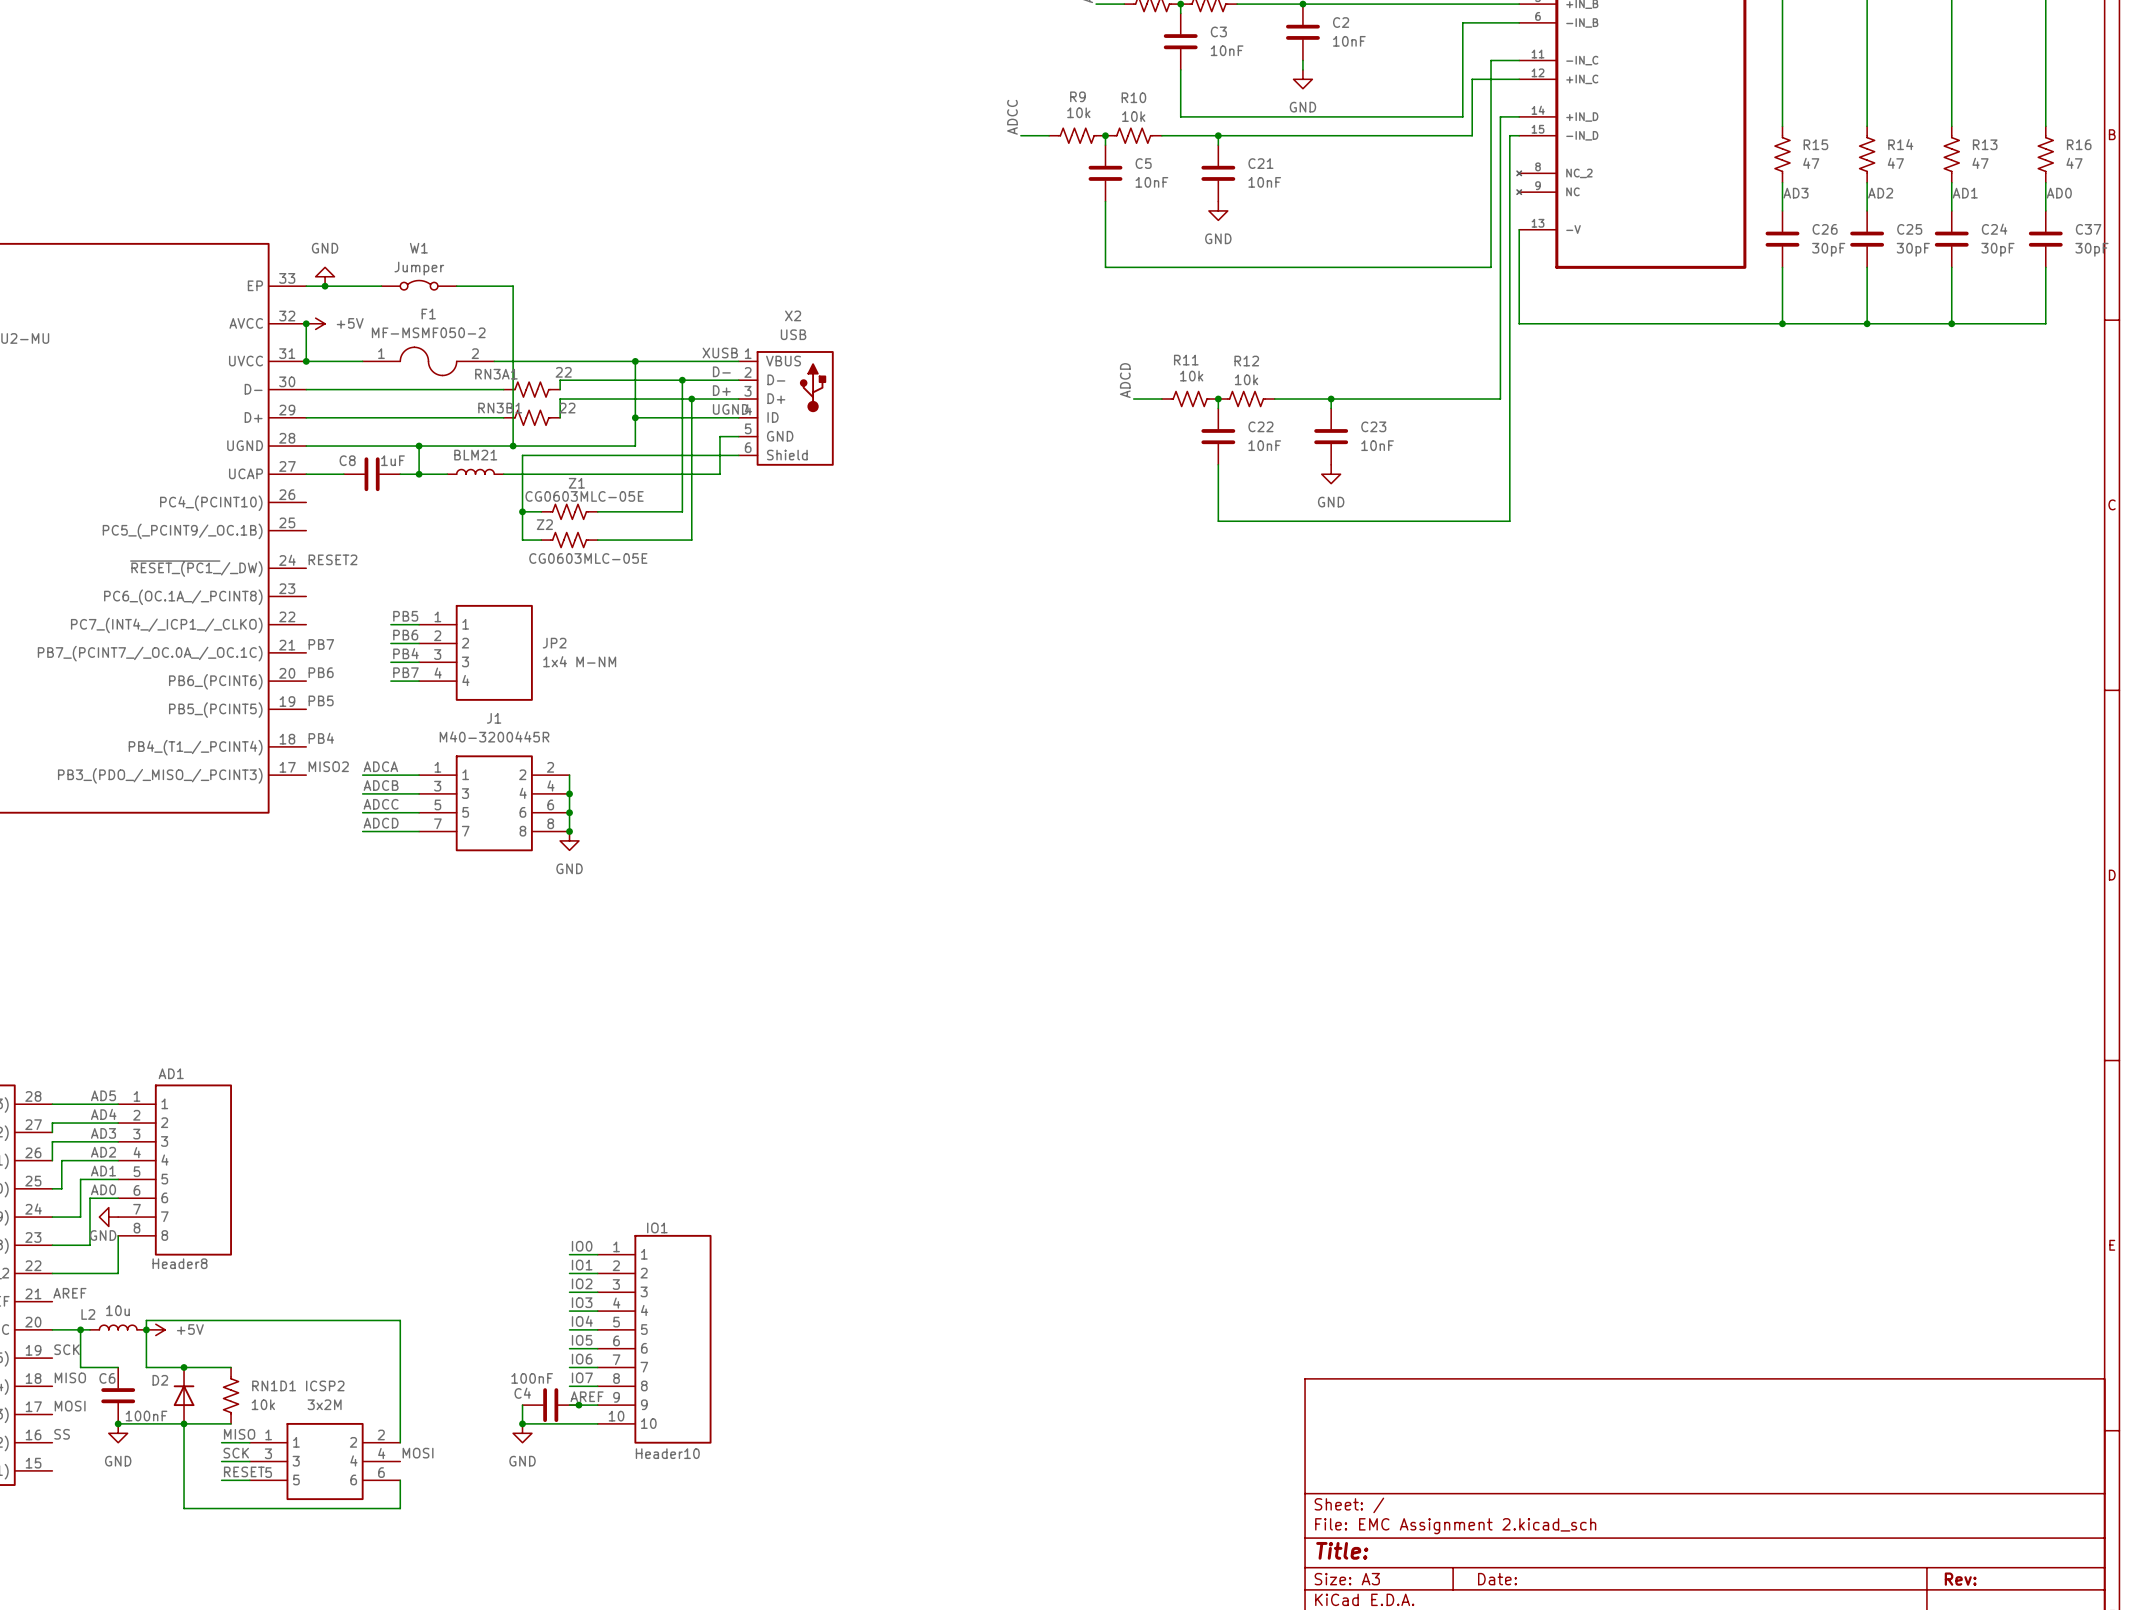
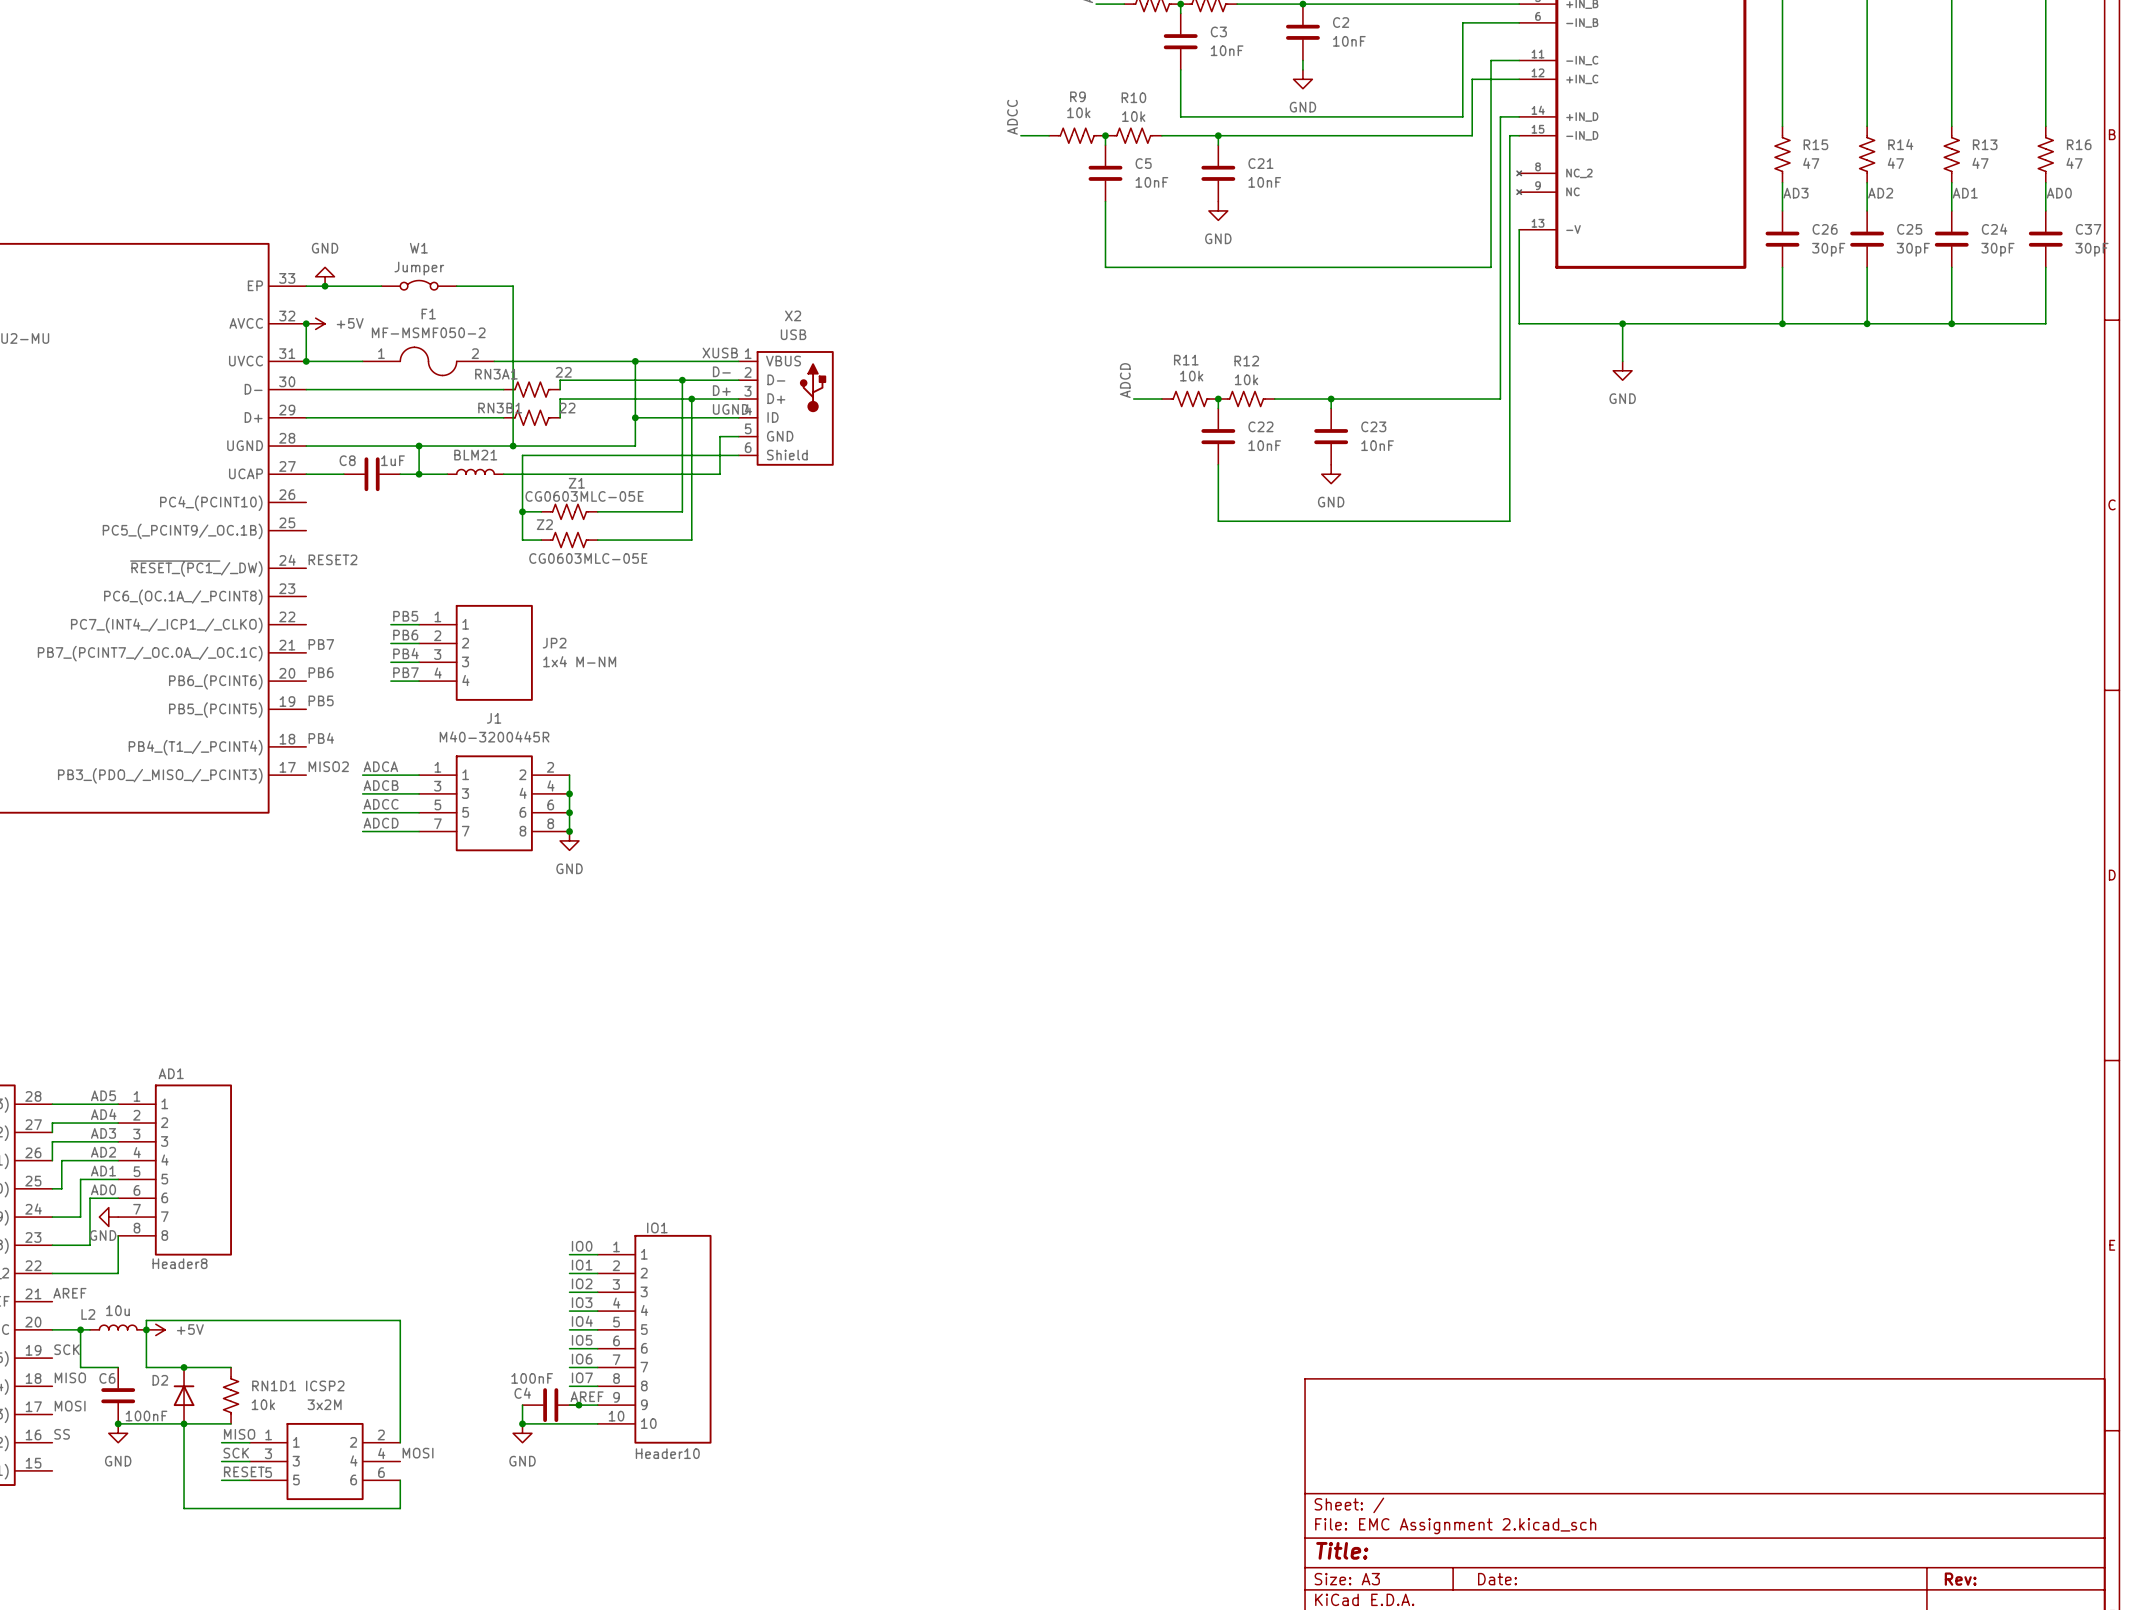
wire: none -> (1622, 323) (1622, 361)
junction: none -> (1622, 323)
power symbol: none -> GND (1622, 370)

